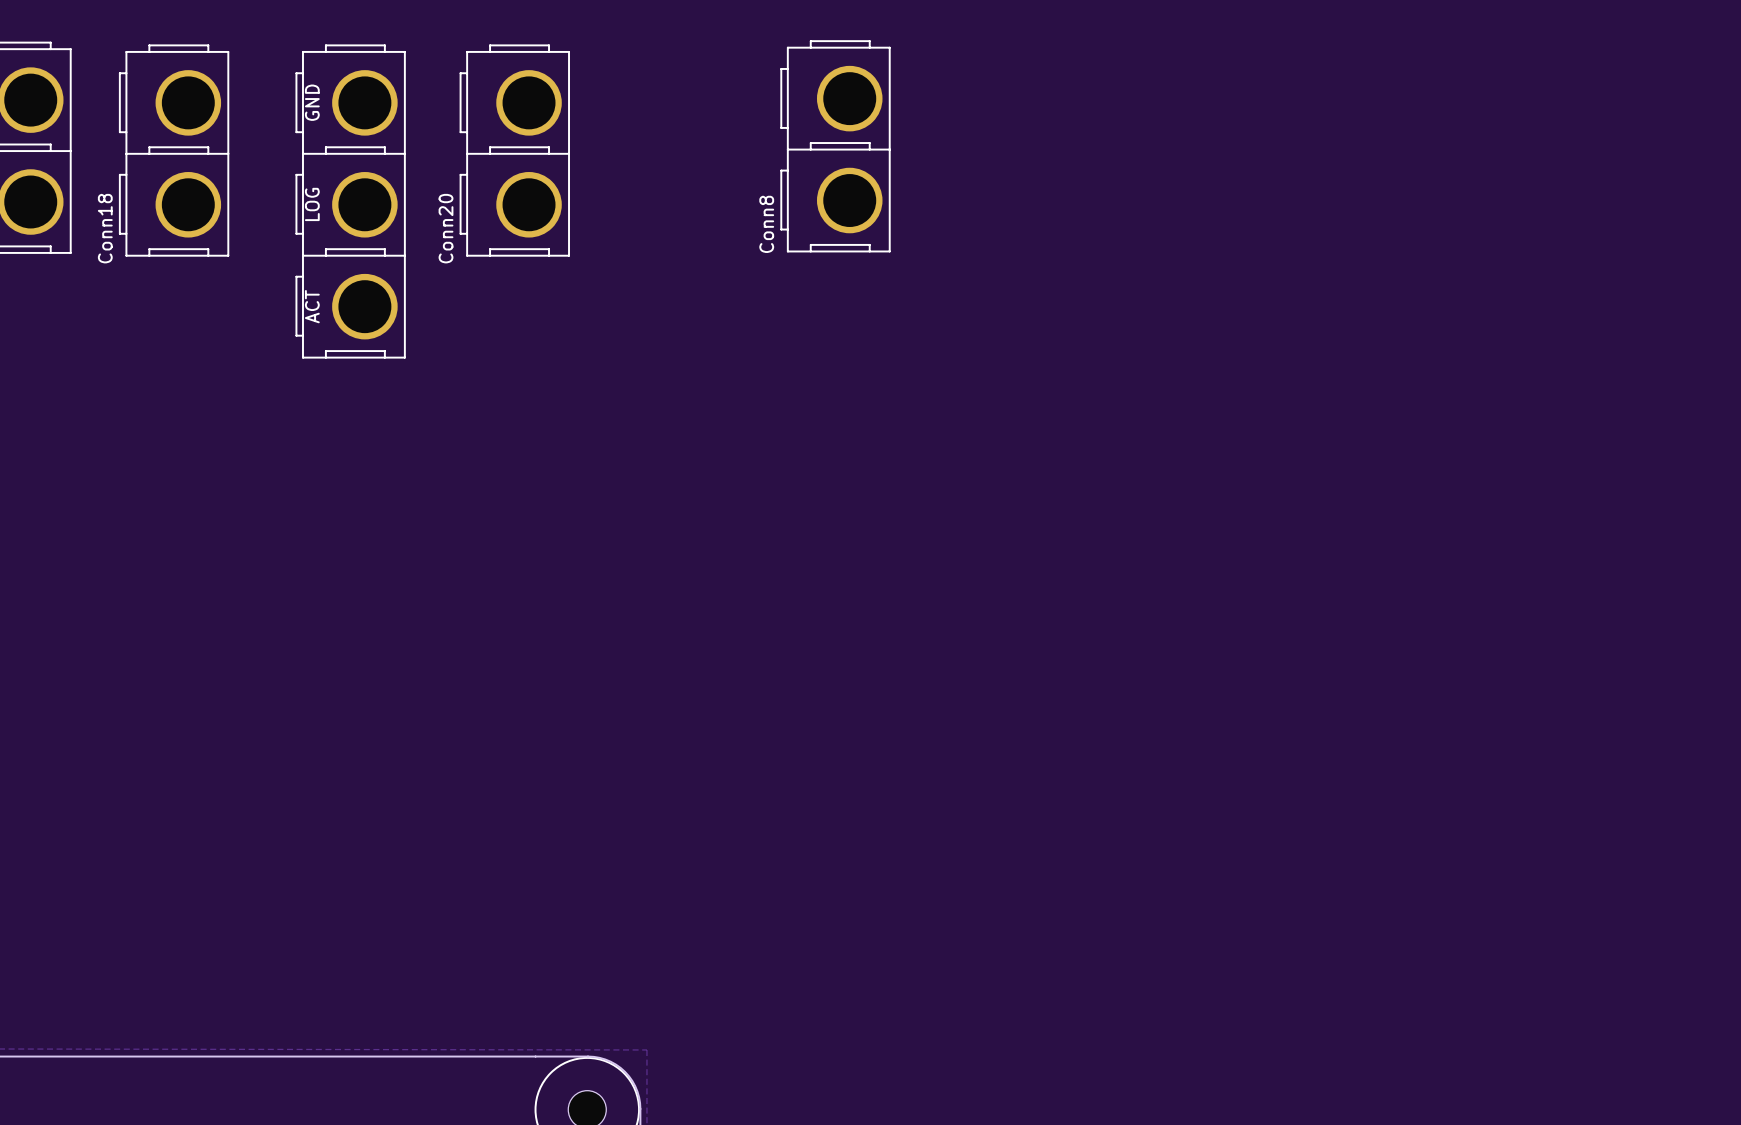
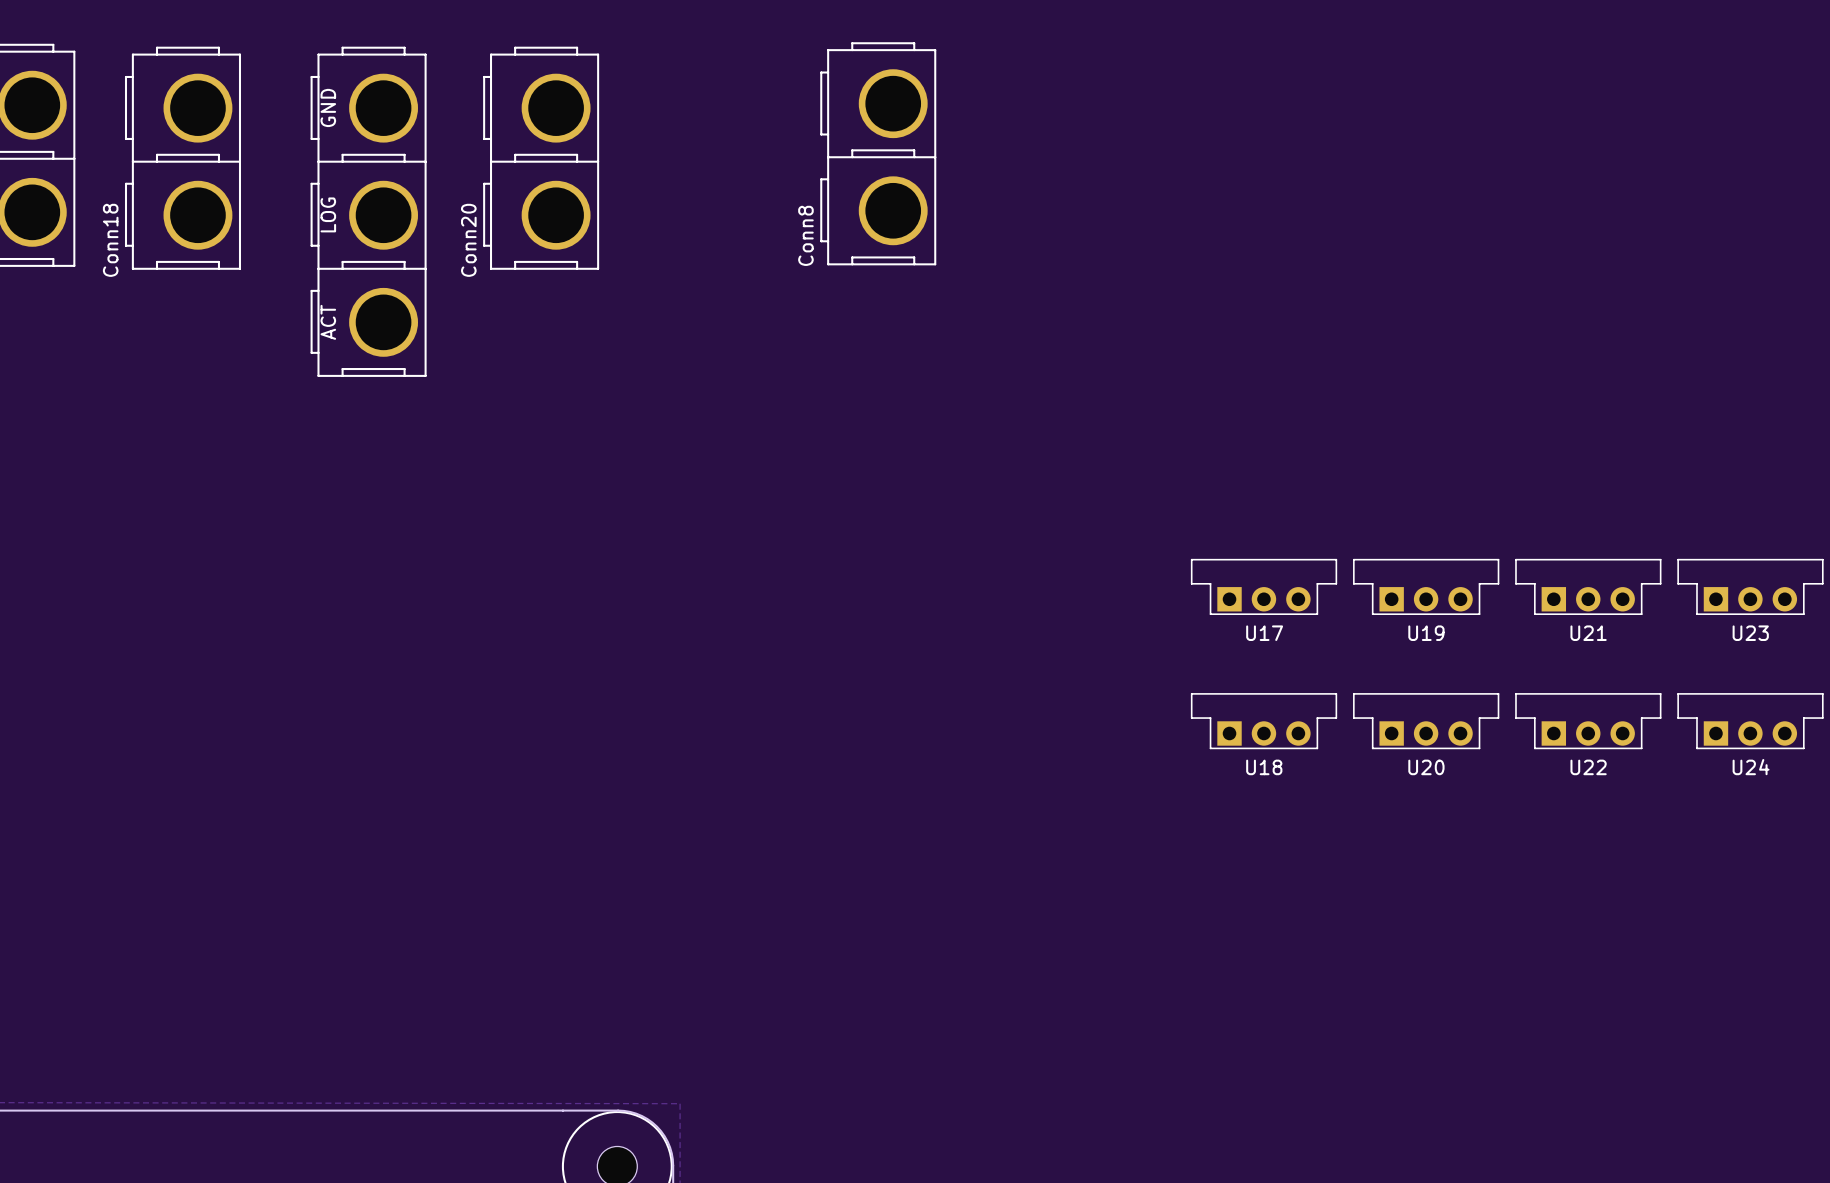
U17: none -> (1264, 586)
U19: none -> (1426, 586)
U21: none -> (1588, 586)
U23: none -> (1750, 586)
U18: none -> (1264, 721)
U20: none -> (1426, 721)
U22: none -> (1588, 721)
U24: none -> (1750, 721)

